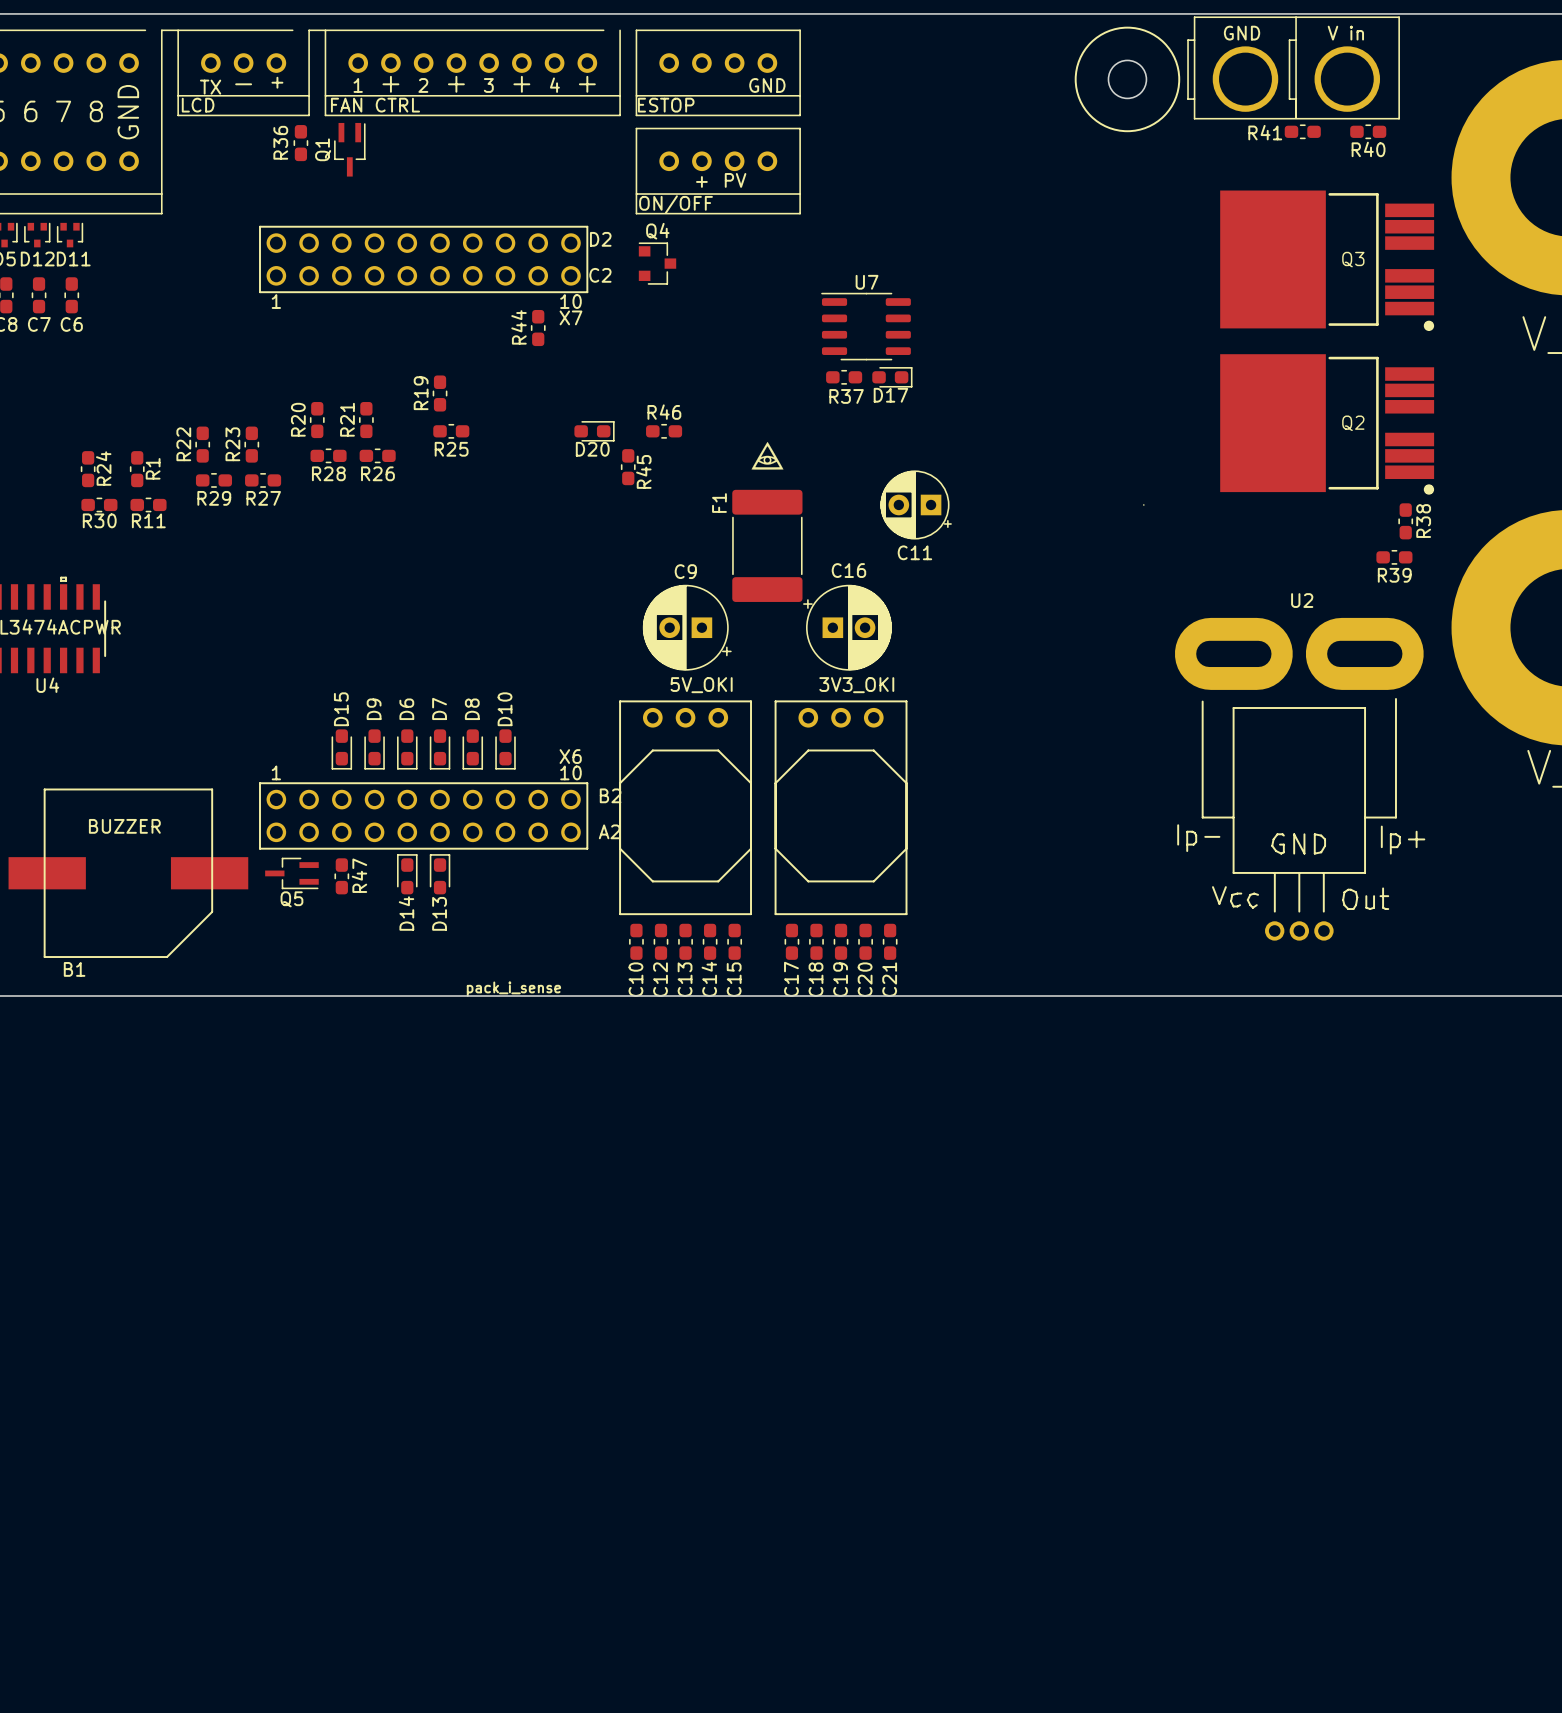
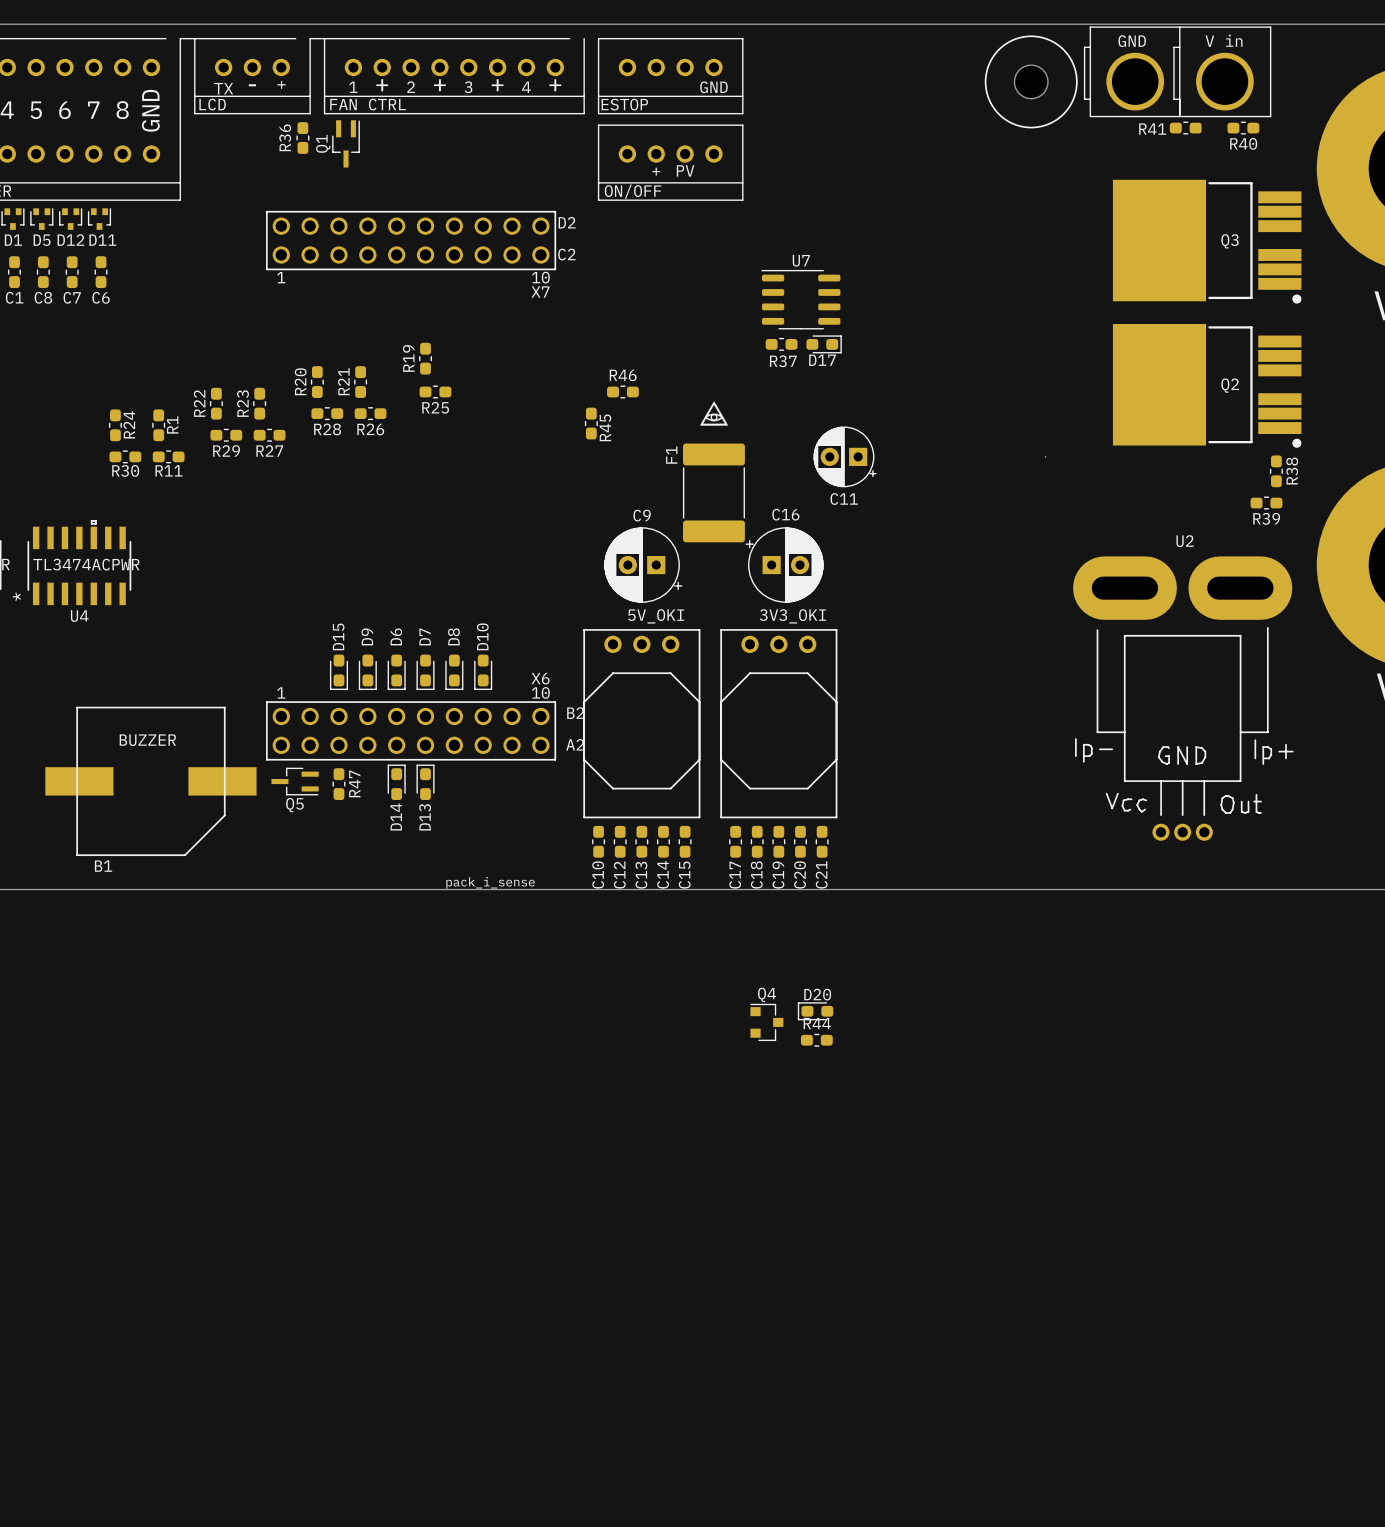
Q4 position: (657, 263) -> (766, 1022)
R44 rotation: 0° (538, 328) -> 90° clockwise (816, 1040)
R44 position: (538, 328) -> (816, 1040)
D20 rotation: 0° (594, 431) -> 180° (815, 1011)
D20 position: (594, 431) -> (815, 1011)

